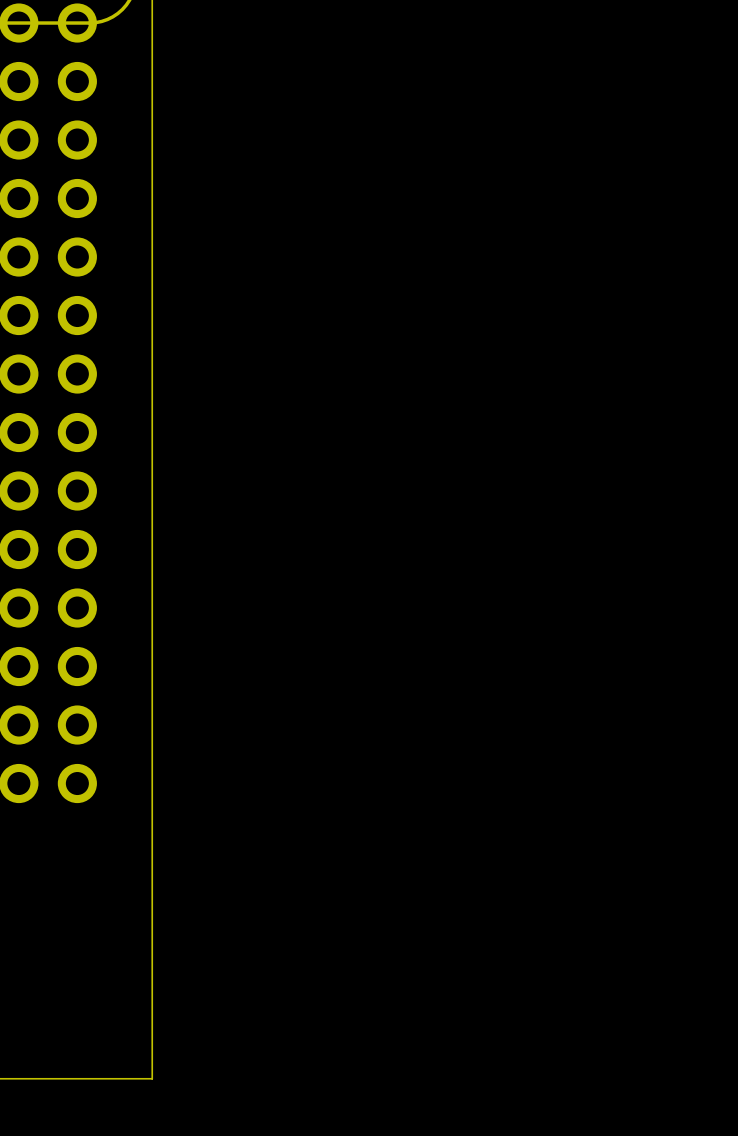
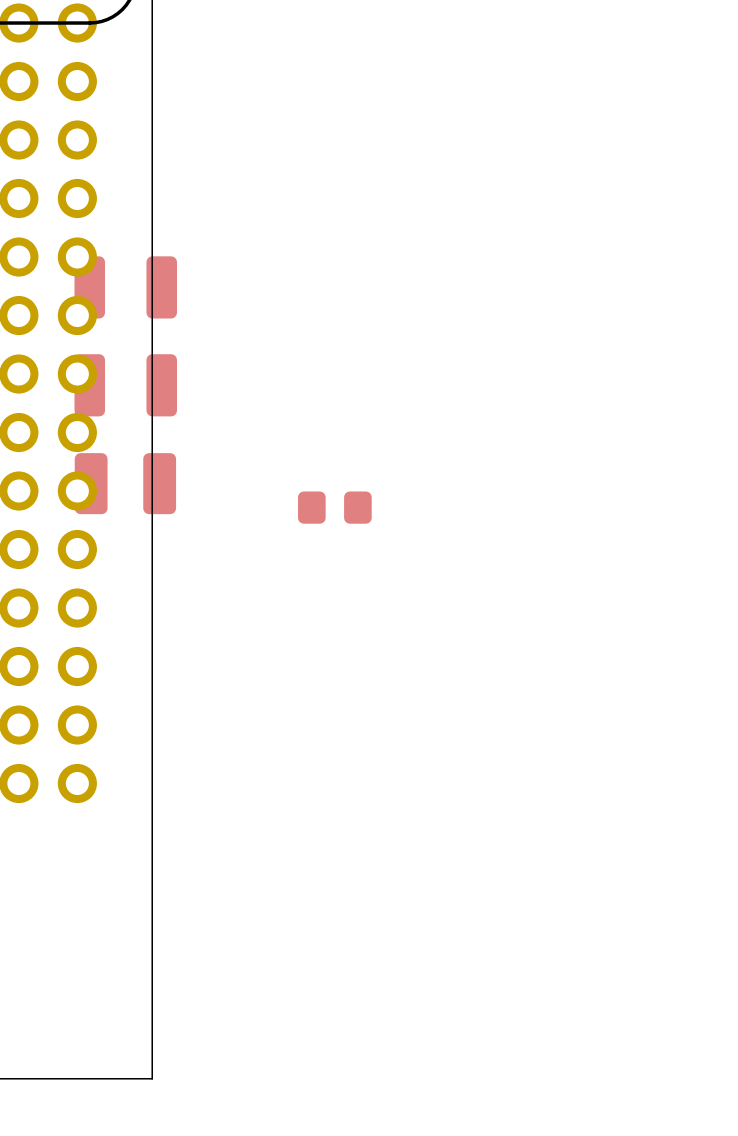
part: none -> (125, 287)
part: none -> (125, 385)
part: none -> (125, 483)
part: none -> (334, 507)

